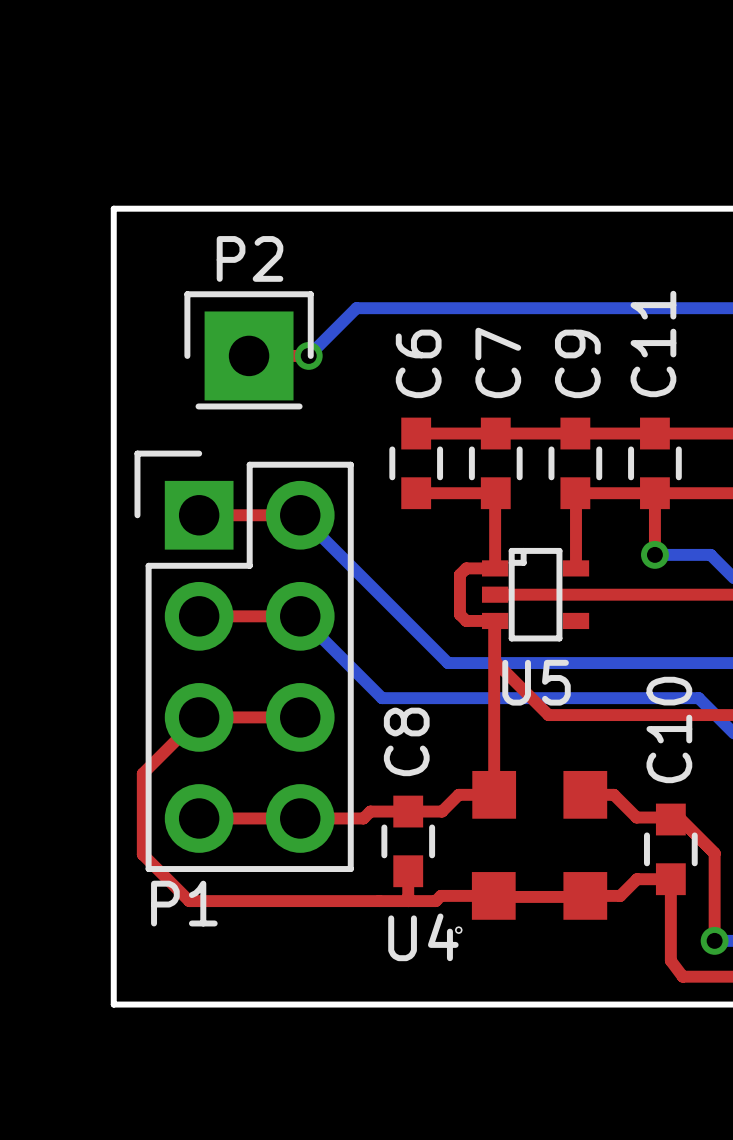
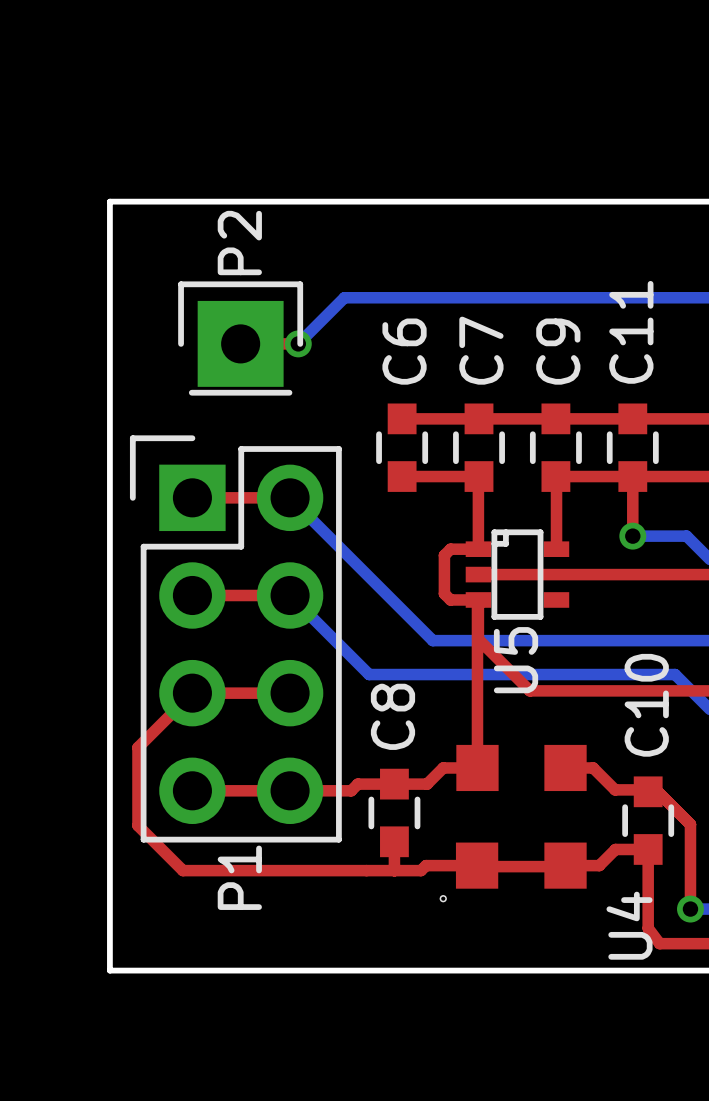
P2 name rotation: 0° (250, 258) -> 90° counterclockwise (239, 243)
U5 name rotation: 0° (536, 682) -> 90° counterclockwise (516, 660)
P1 name rotation: 0° (184, 903) -> 90° counterclockwise (239, 877)
U4 name rotation: 0° (423, 937) -> 90° counterclockwise (629, 925)
U4 name position: U4 (423, 937) -> U4 (629, 925)

